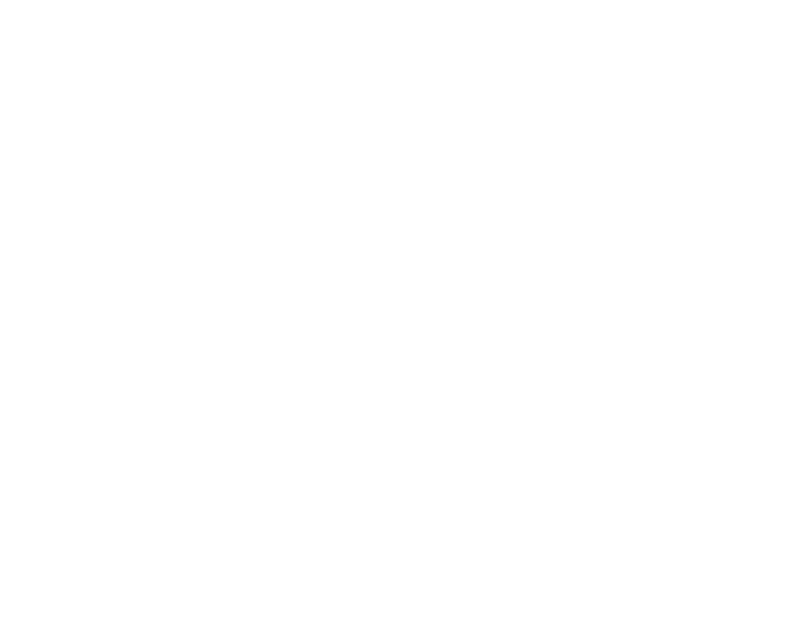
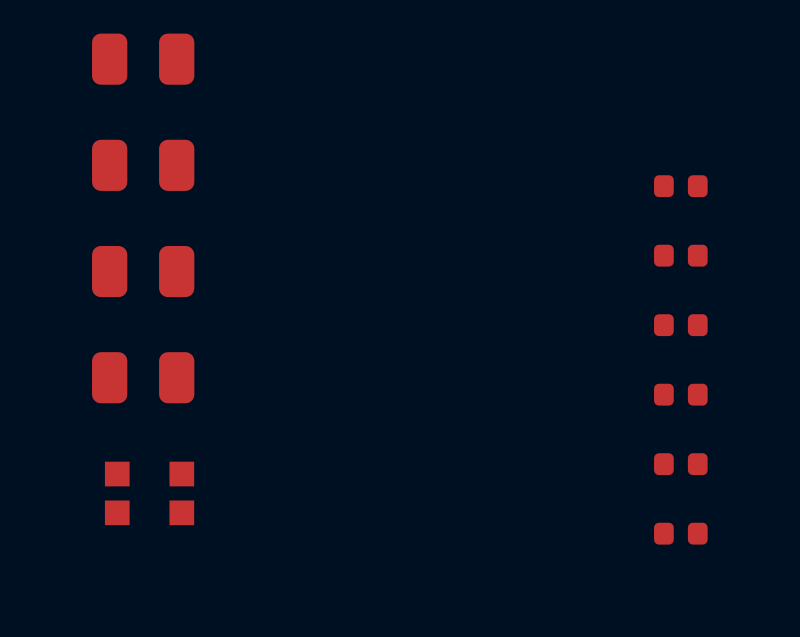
part: none -> (143, 59)
part: none -> (143, 165)
part: none -> (680, 186)
part: none -> (680, 255)
part: none -> (143, 271)
part: none -> (680, 325)
part: none -> (143, 377)
part: none -> (680, 394)
part: none -> (680, 464)
part: none -> (149, 493)
part: none -> (680, 533)

